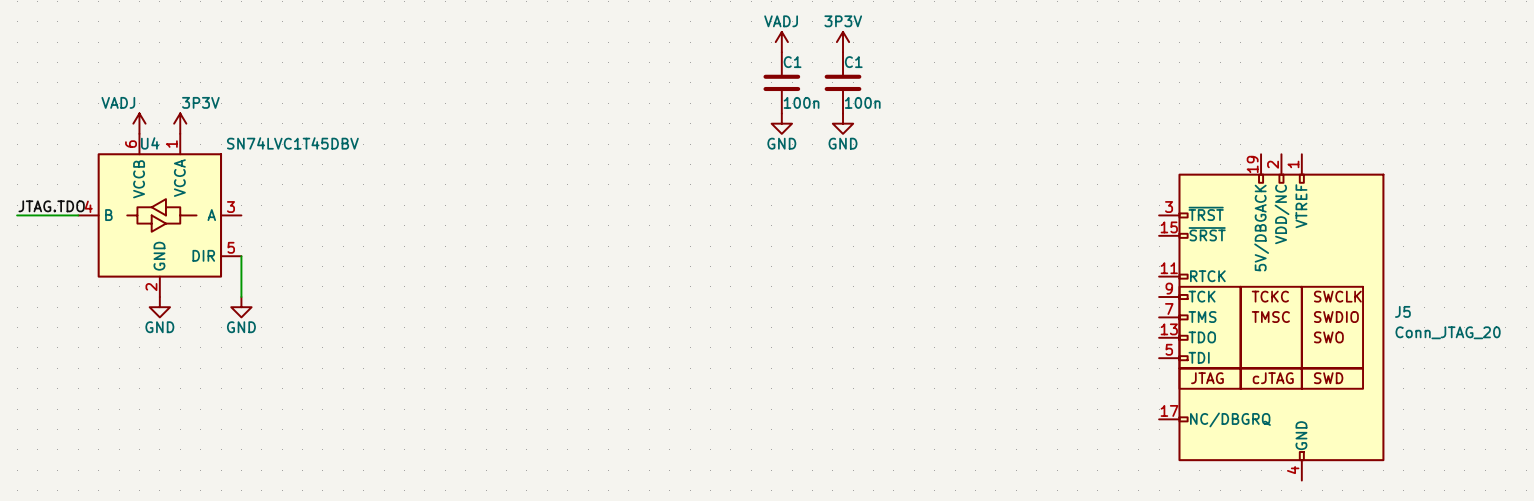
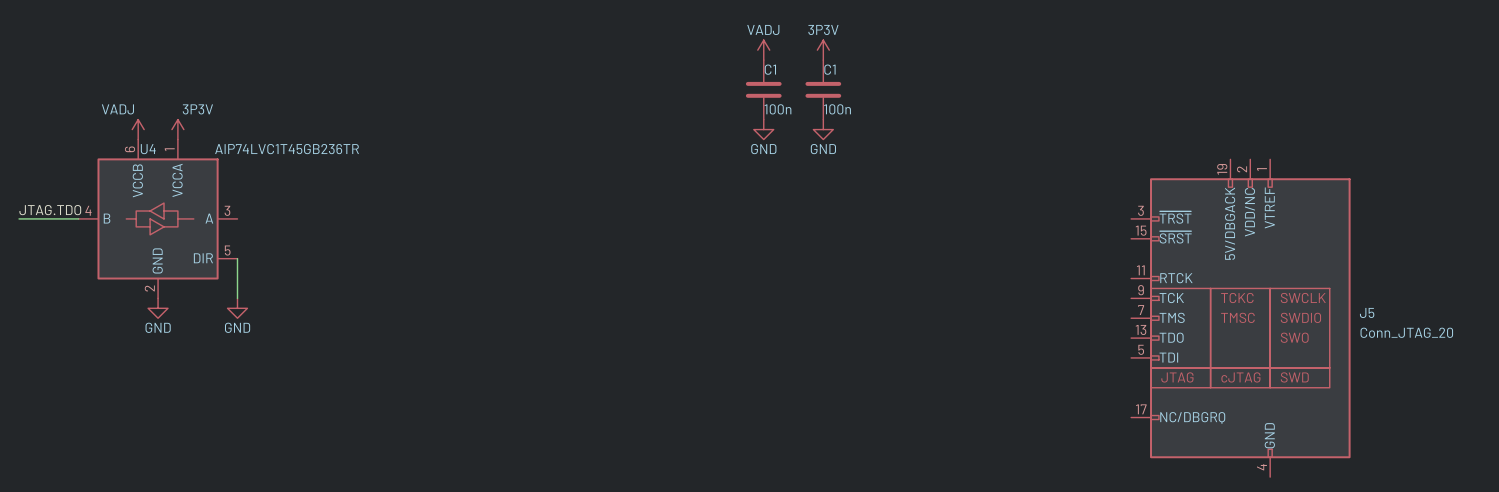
U4 value: SN74LVC1T45DBV (292, 143) -> AIP74LVC1T45GB236TR (287, 149)

